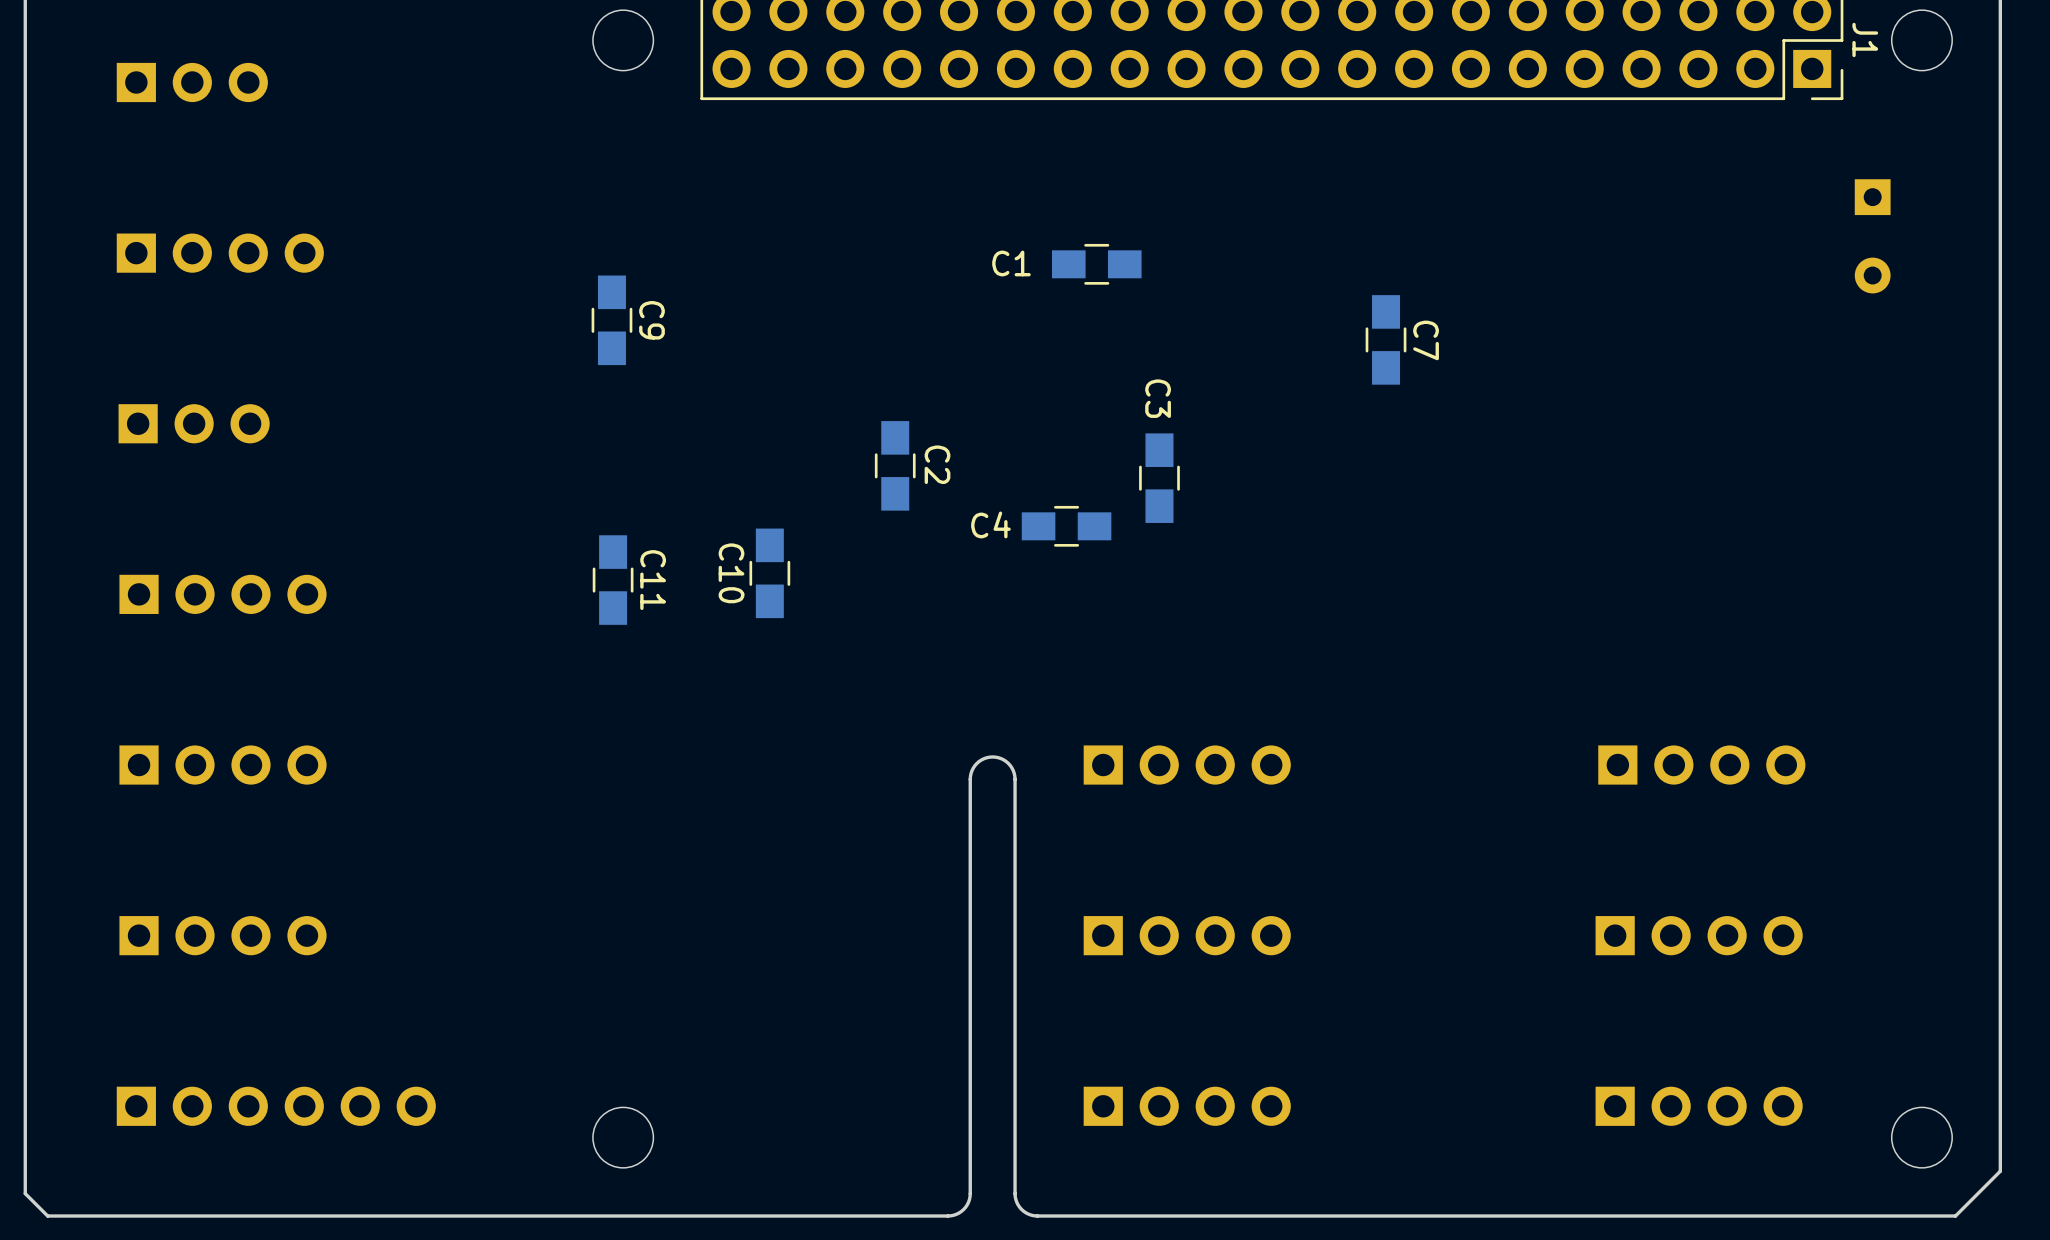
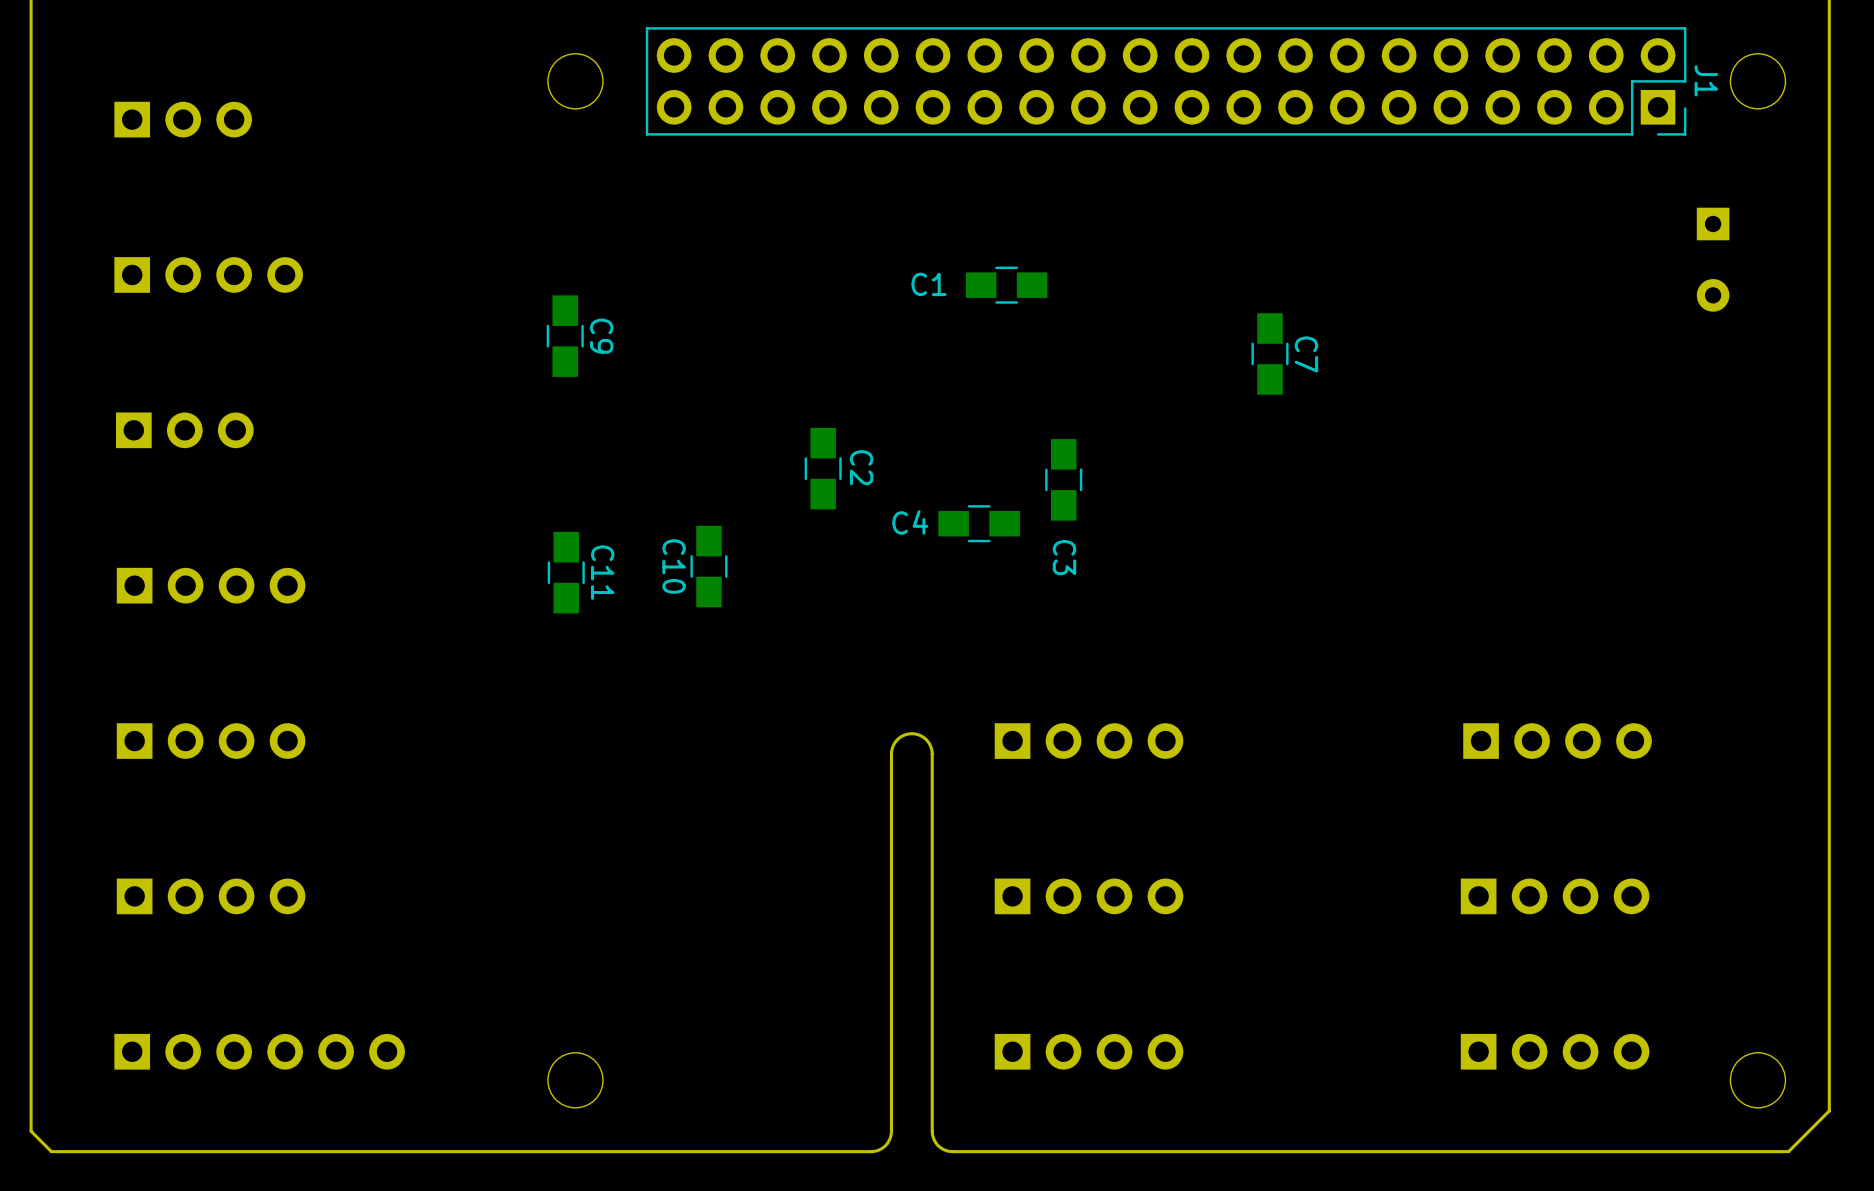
C3 name position: C3 (1158, 398) -> C3 (1064, 557)

